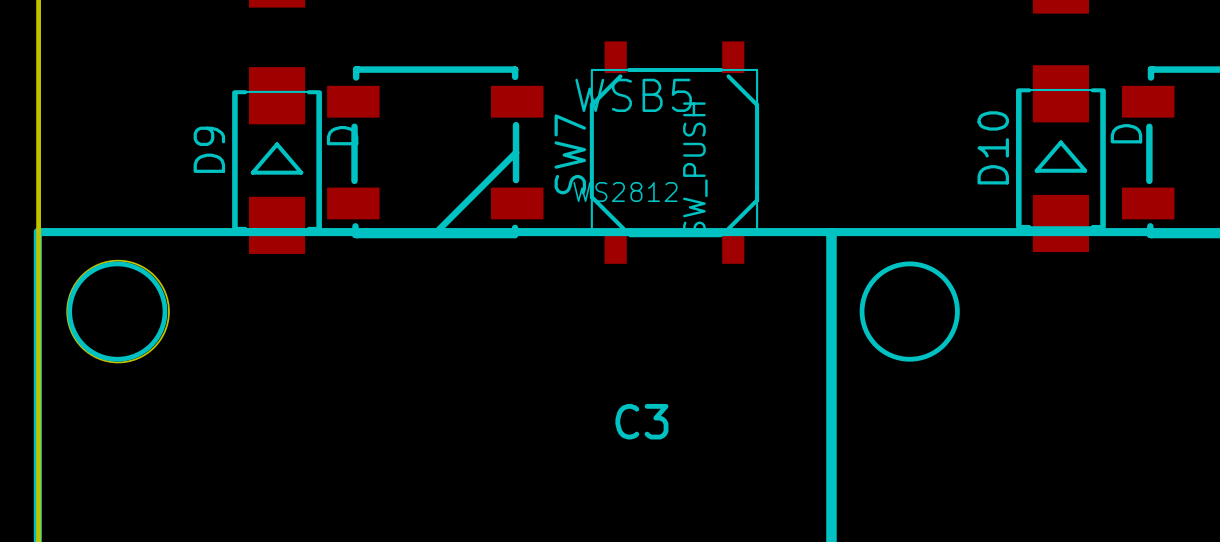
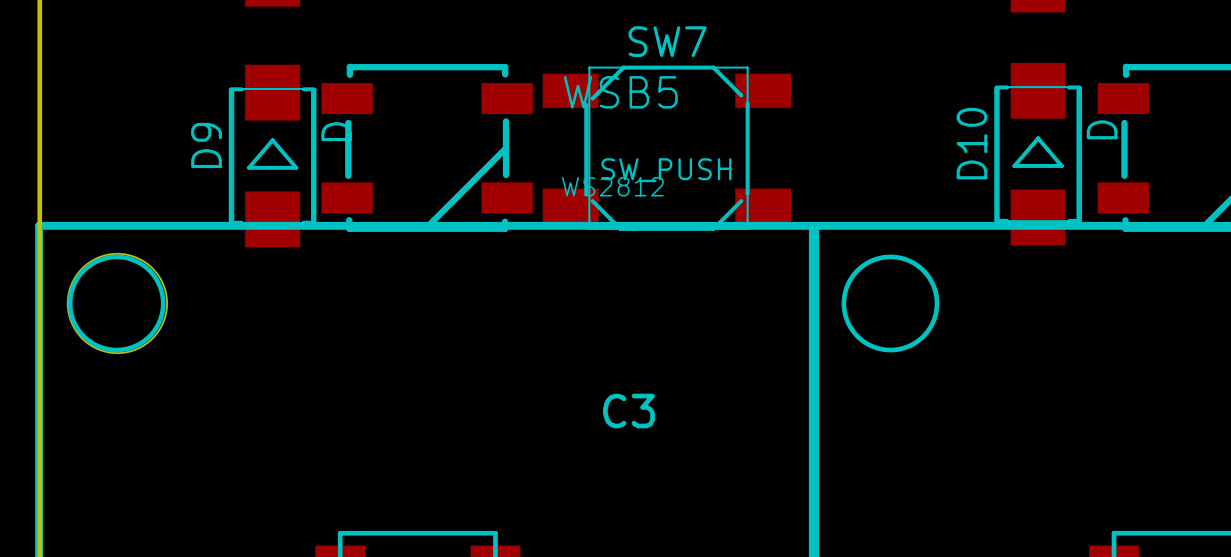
SW7 footprint: [589, 41, 760, 264] -> [542, 65, 792, 231]
SW7 name position: SW7 (570, 154) -> SW7 (667, 41)

